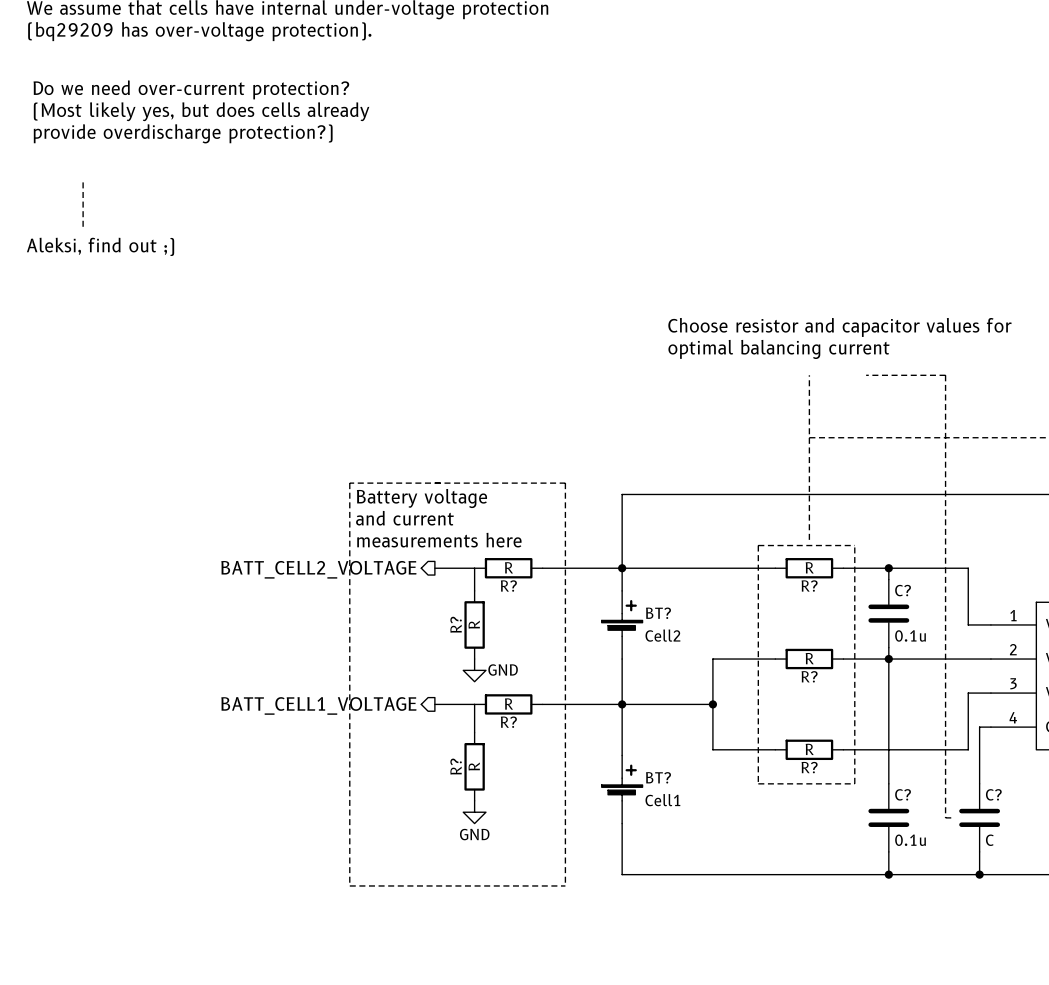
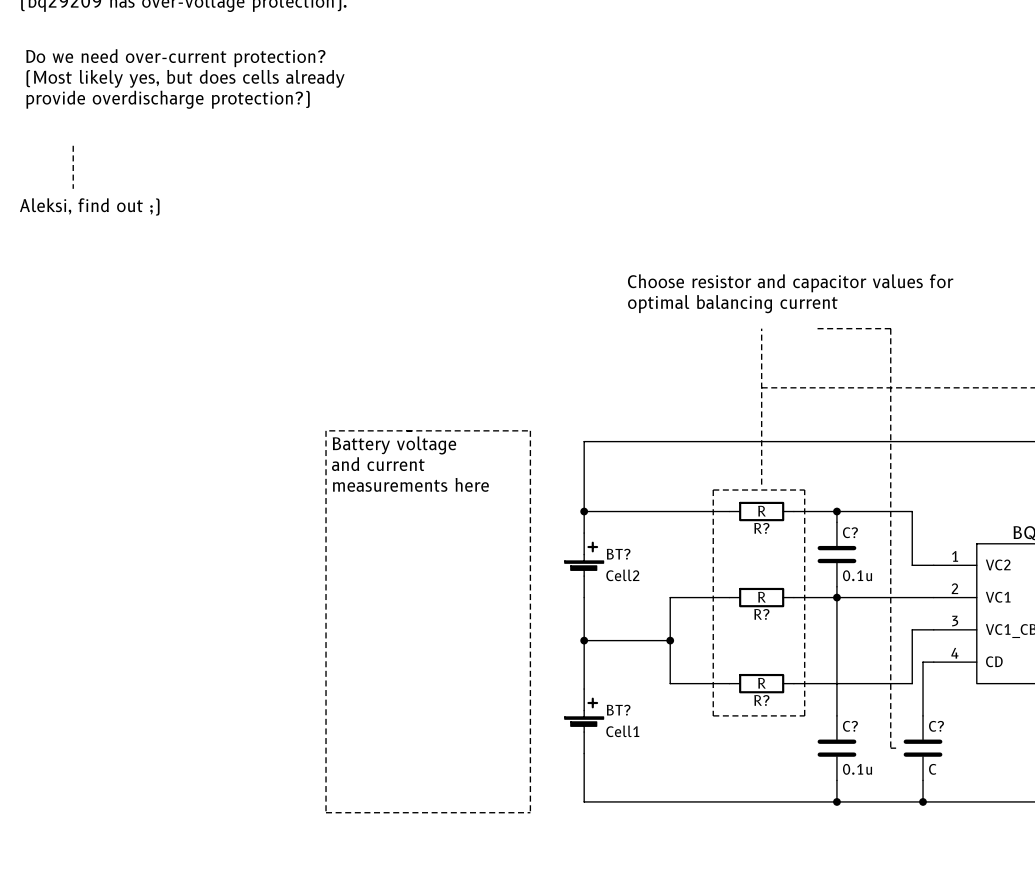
wire: (434, 568) (474, 568) (474, 590) -> none
R?: R (508, 568) -> none
wire: (542, 568) (622, 568) -> none
hierarchical label: BATT_CELL2_VOLTAGE (318, 569) -> none
R?: R (474, 624) -> none
power symbol: GND (474, 670) -> none
wire: (434, 704) (474, 704) (474, 732) -> none
R?: R (508, 704) -> none
wire: (542, 704) (622, 704) -> none
hierarchical label: BATT_CELL1_VOLTAGE (318, 705) -> none
R?: R (474, 766) -> none
power symbol: GND (474, 812) -> none

